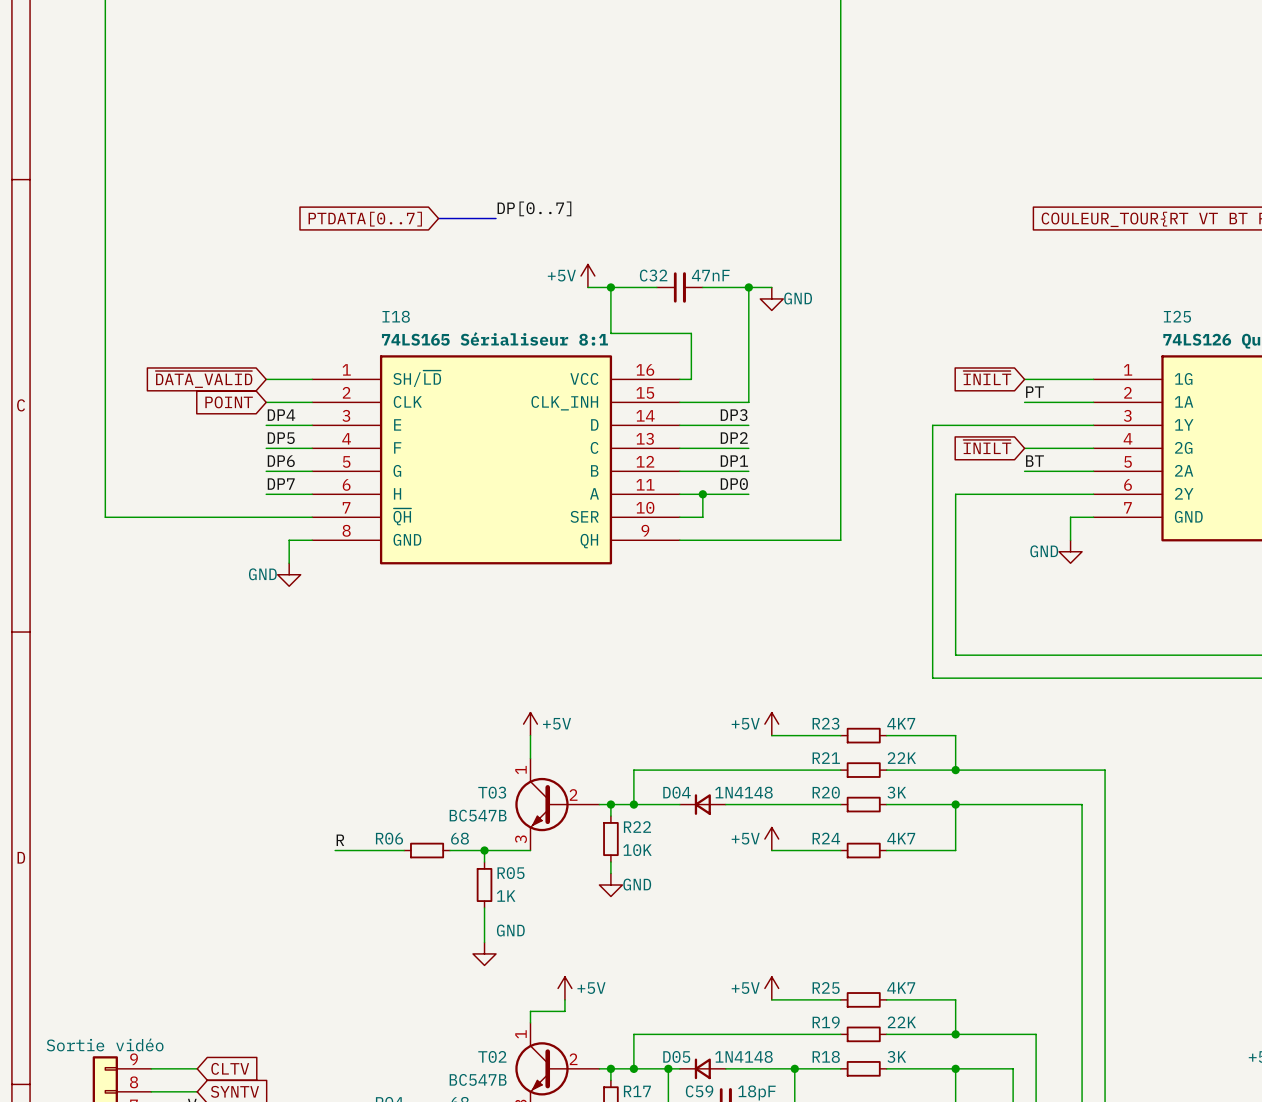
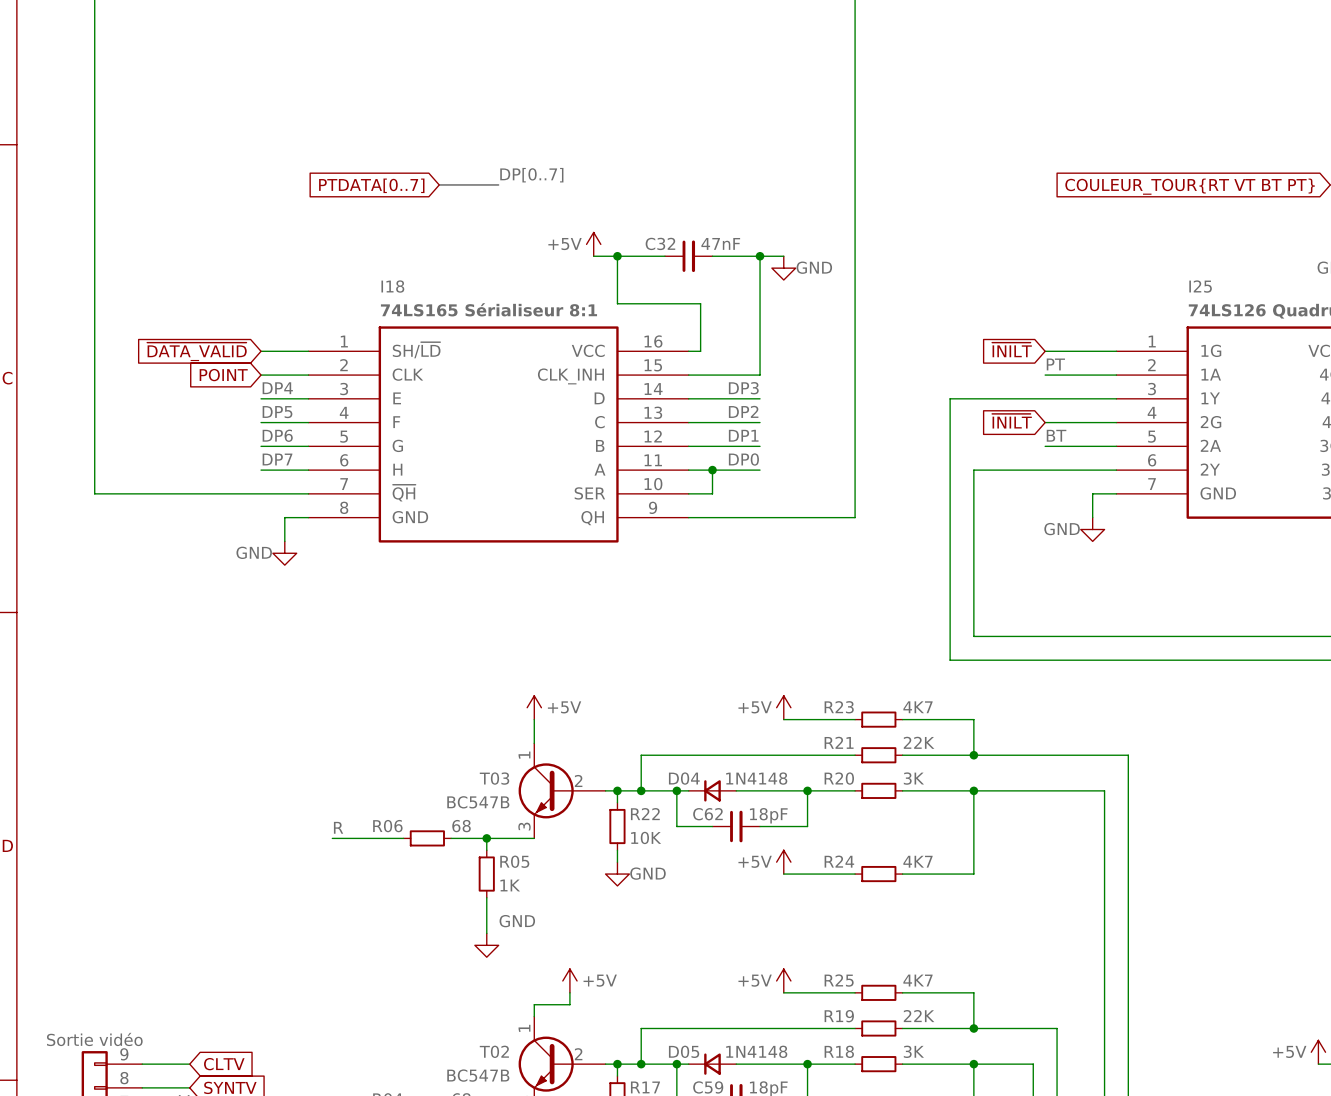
wire: none -> (676, 790) (676, 826) (712, 826)
junction: none -> (676, 790)
wire: none -> (807, 790) (807, 826) (760, 826)
junction: none -> (807, 790)
C62: none -> 18pF (736, 826)
power symbol position: +5V (771, 839) -> +5V (783, 862)
wire: (771, 850) (840, 850) -> (783, 874) (855, 874)
R24 position: (863, 850) -> (878, 874)
wire: (886, 850) (955, 850) -> (902, 874) (973, 874) (973, 838)

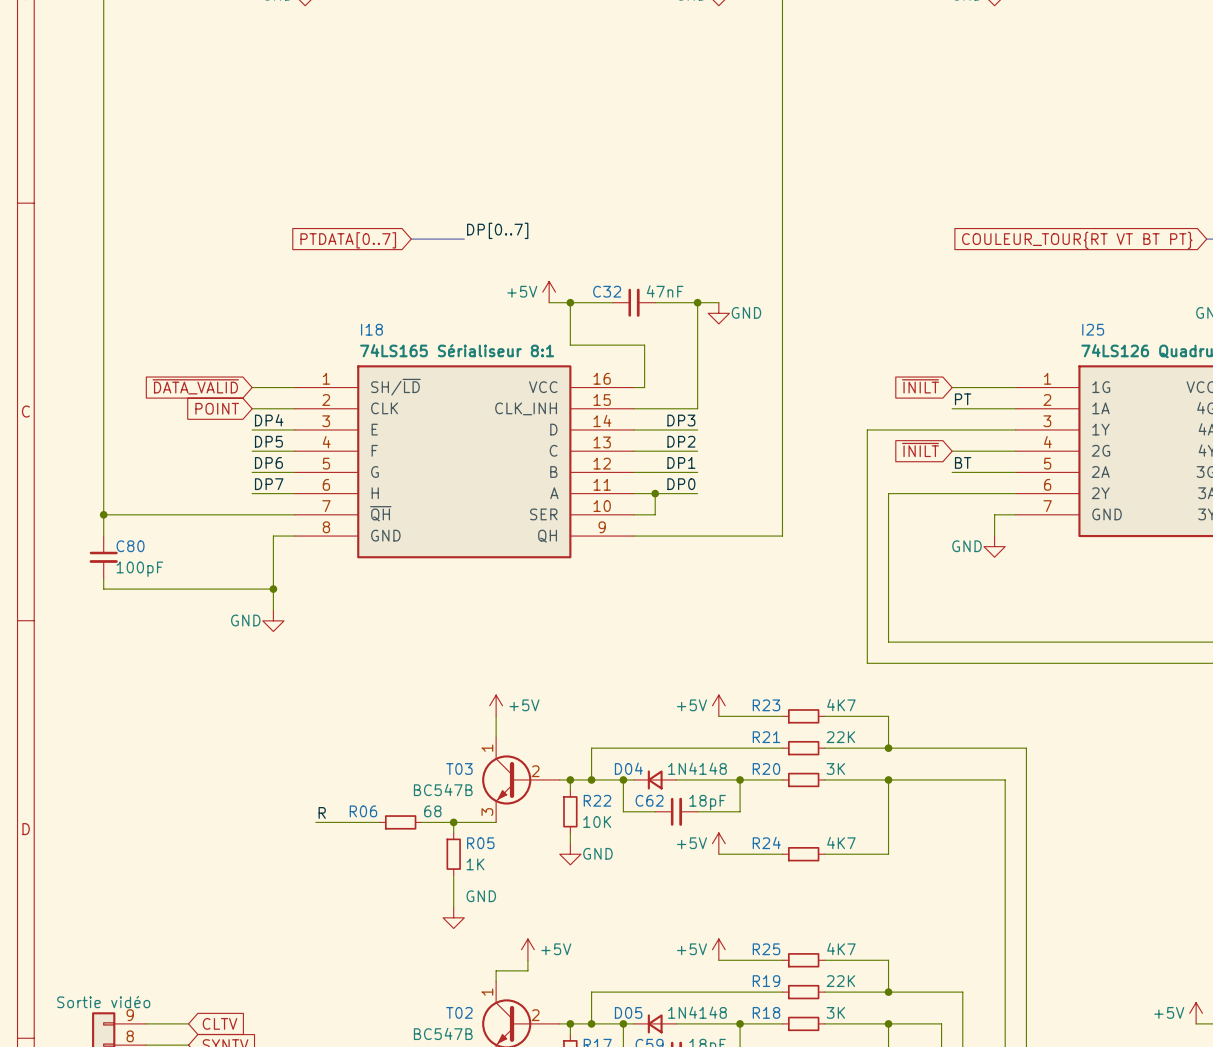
wire: none -> (103, 514) (103, 536)
junction: none -> (103, 514)
C80: none -> 100pF (103, 557)
wire: none -> (273, 557) (273, 610)
power symbol position: GND (284, 553) -> GND (273, 620)
wire: none -> (103, 578) (103, 589) (273, 589)
junction: none -> (273, 589)

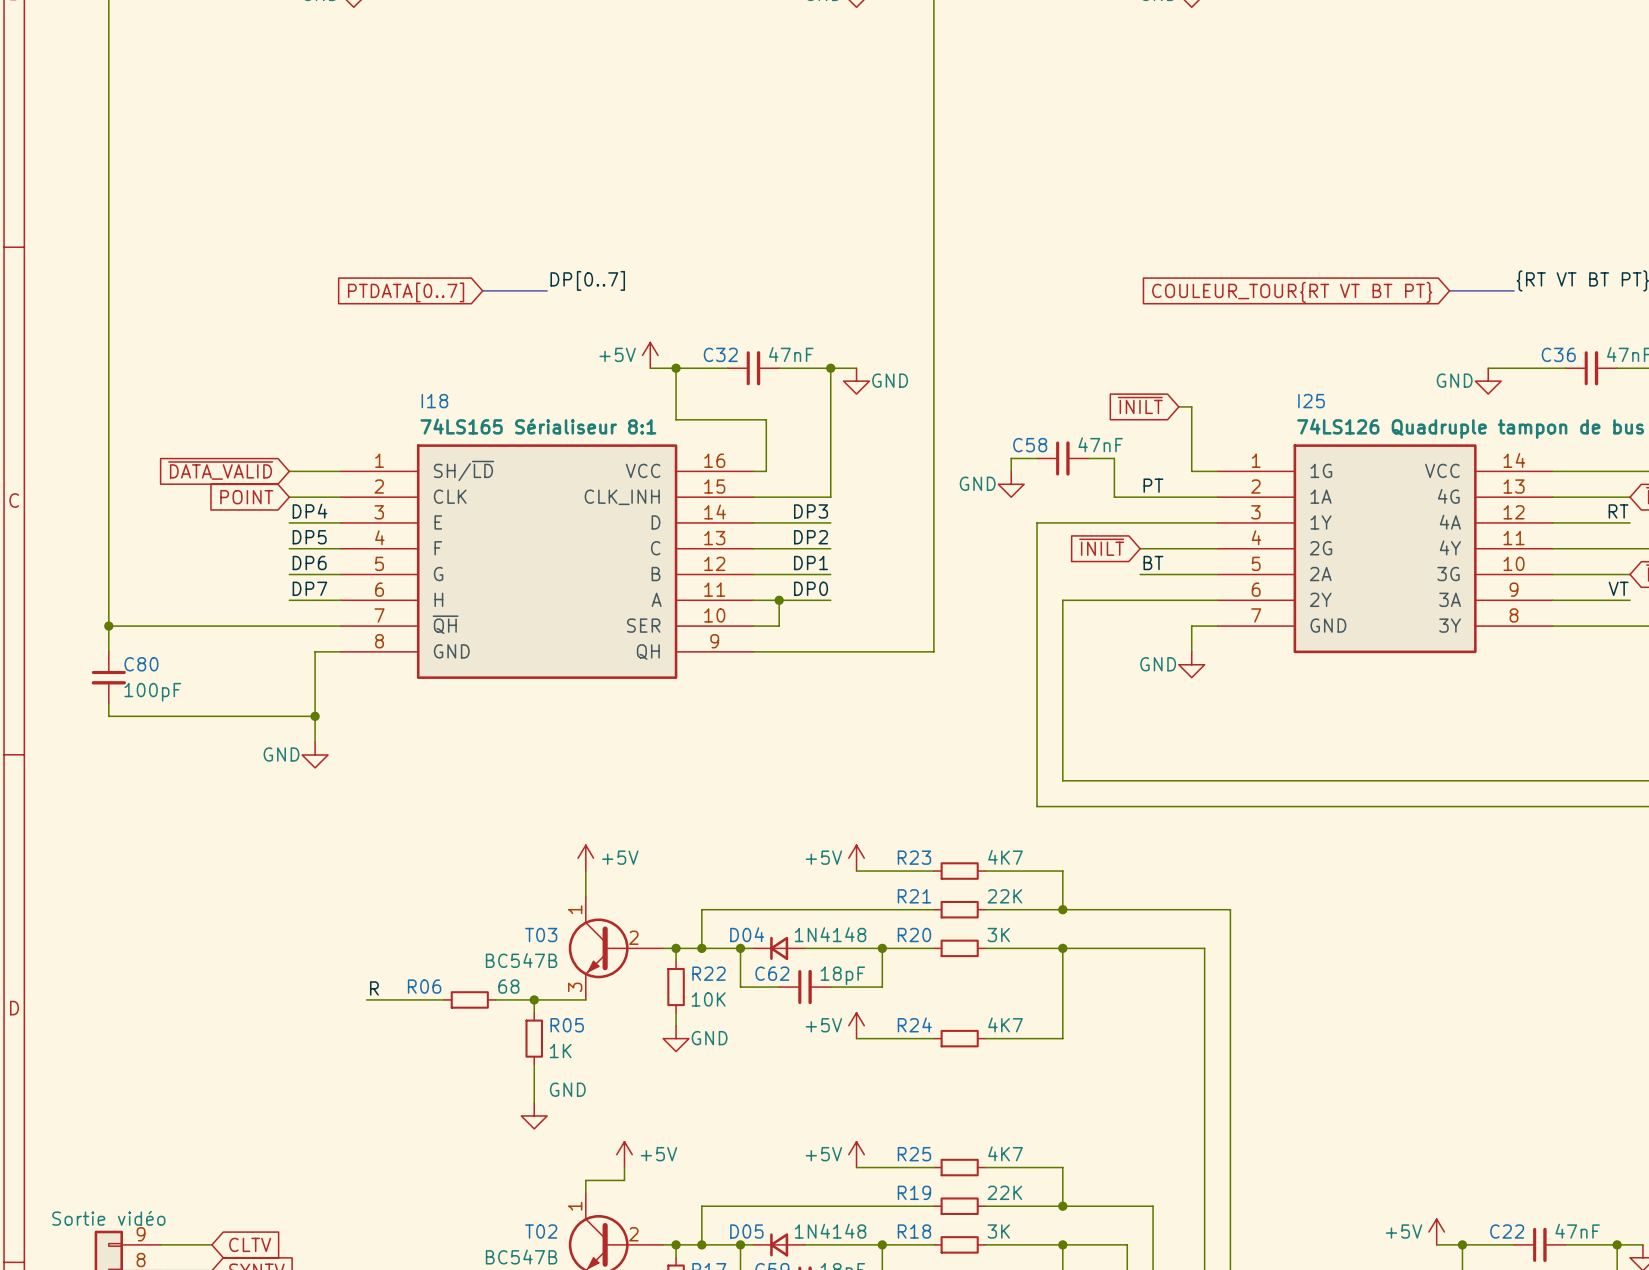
wire: none -> (1037, 458) (1011, 458) (1011, 471)
C58: none -> 47nF (1062, 458)
wire: none -> (1088, 458) (1114, 458) (1114, 497) (1140, 497)
global label position: ~{INILT} (920, 386) -> ~{INILT} (1140, 405)
wire: (952, 387) (994, 387) -> (1178, 406) (1191, 406) (1191, 471)
power symbol: none -> GND (1011, 484)

